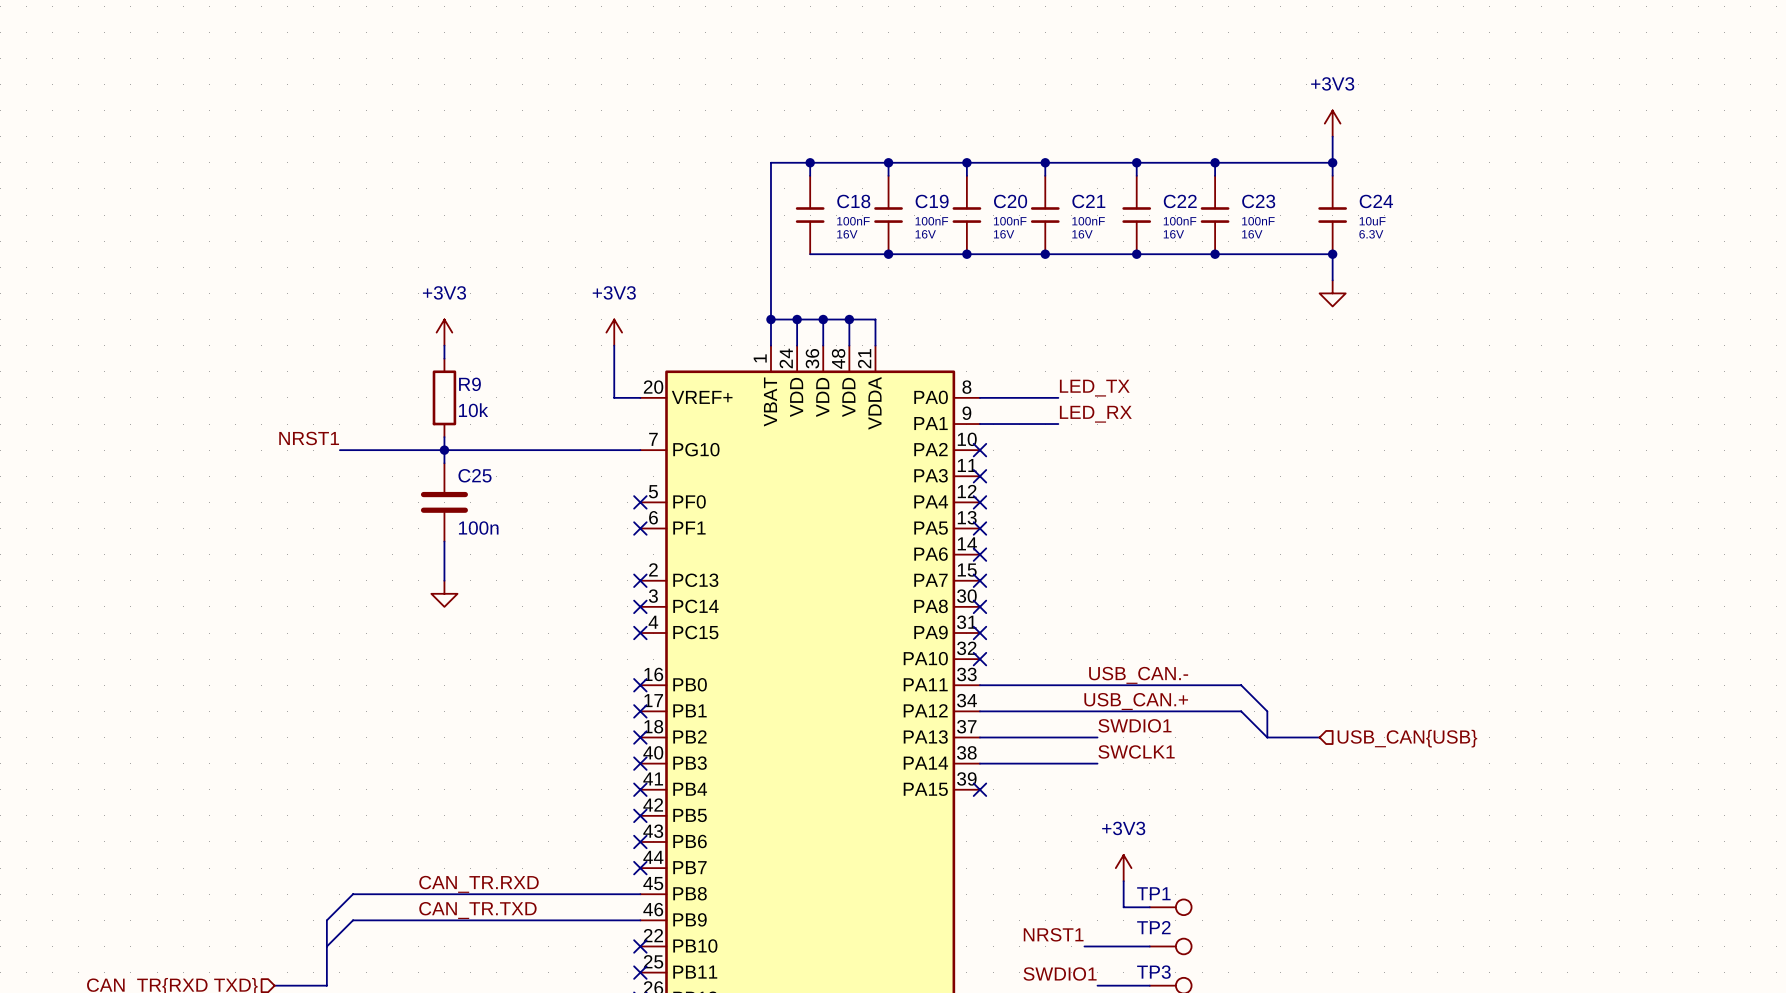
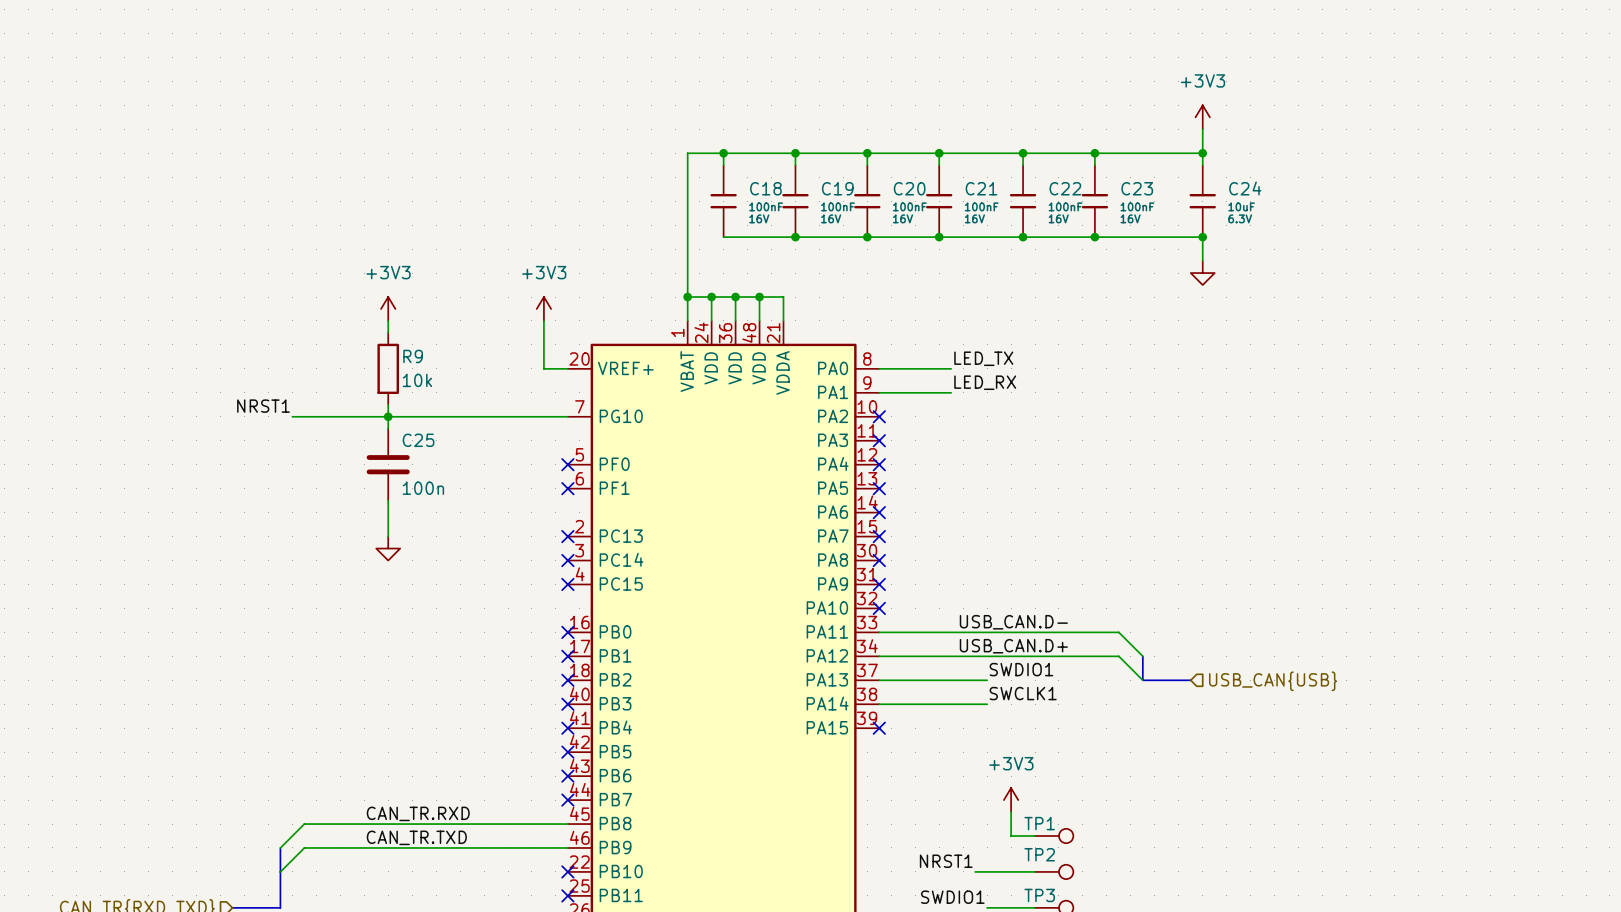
label: USB_CAN.- (1138, 675) -> USB_CAN.D- (1013, 622)
label: USB_CAN.+ (1136, 701) -> USB_CAN.D+ (1013, 646)

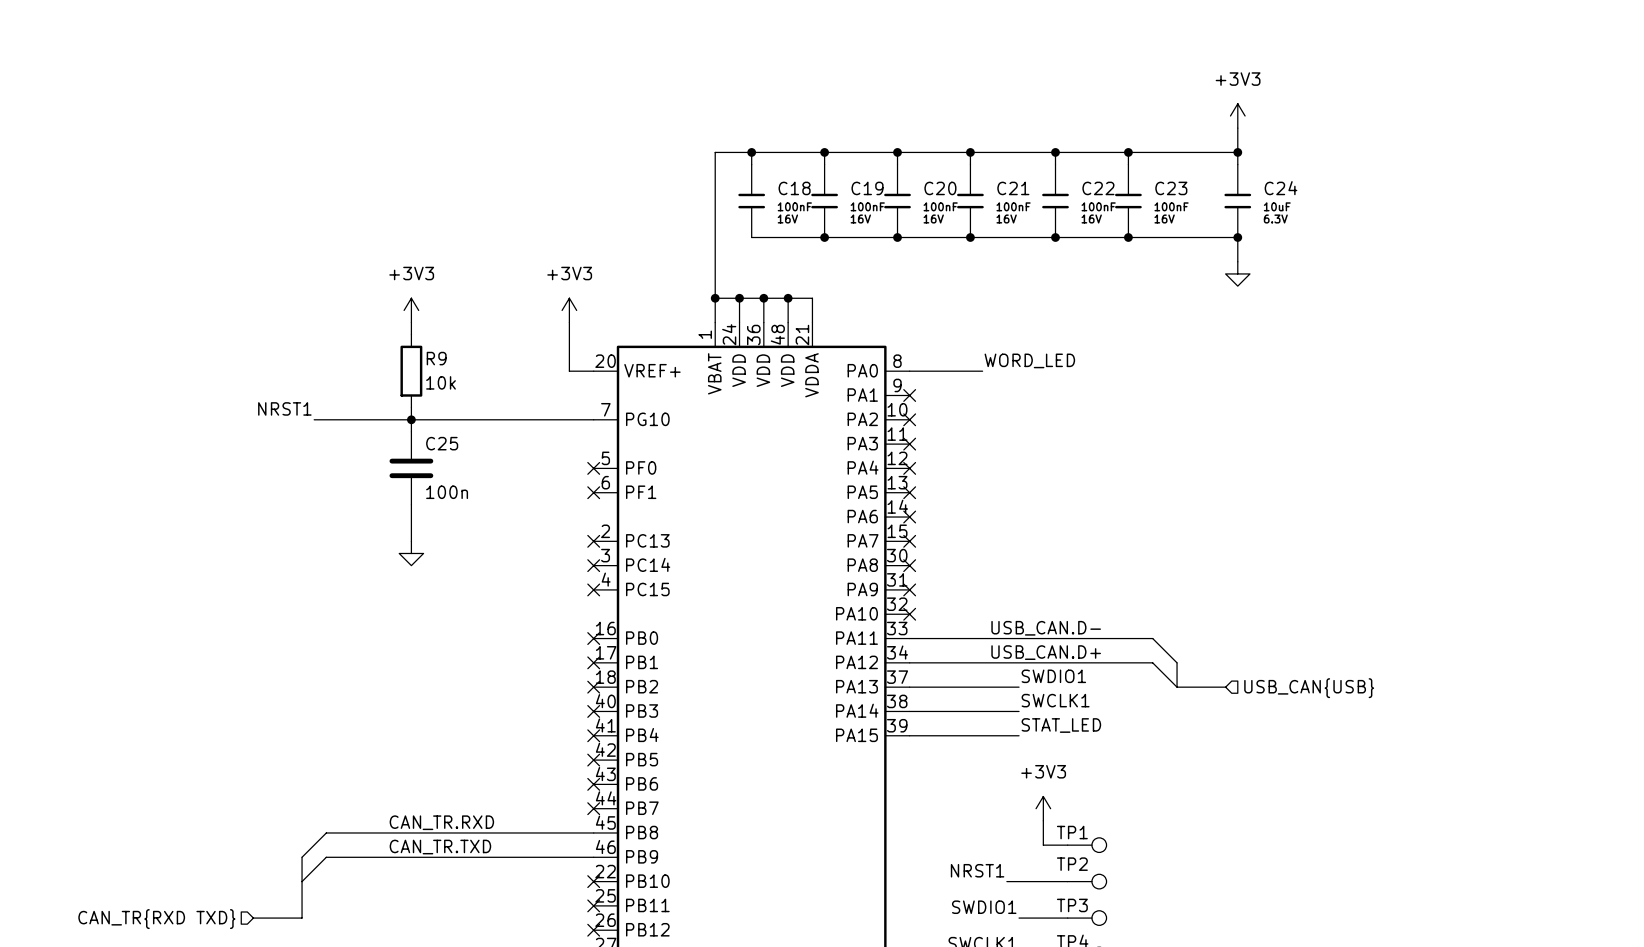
label: LED_TX (983, 358) -> WORD_LED (1029, 360)
label: LED_RX (985, 382) -> none
wire: (879, 392) (951, 392) -> none
no-connect mark: none -> (909, 395)
label: none -> STAT_LED (1061, 725)
wire: none -> (909, 735) (1019, 735)
no-connect mark: (879, 728) -> none

